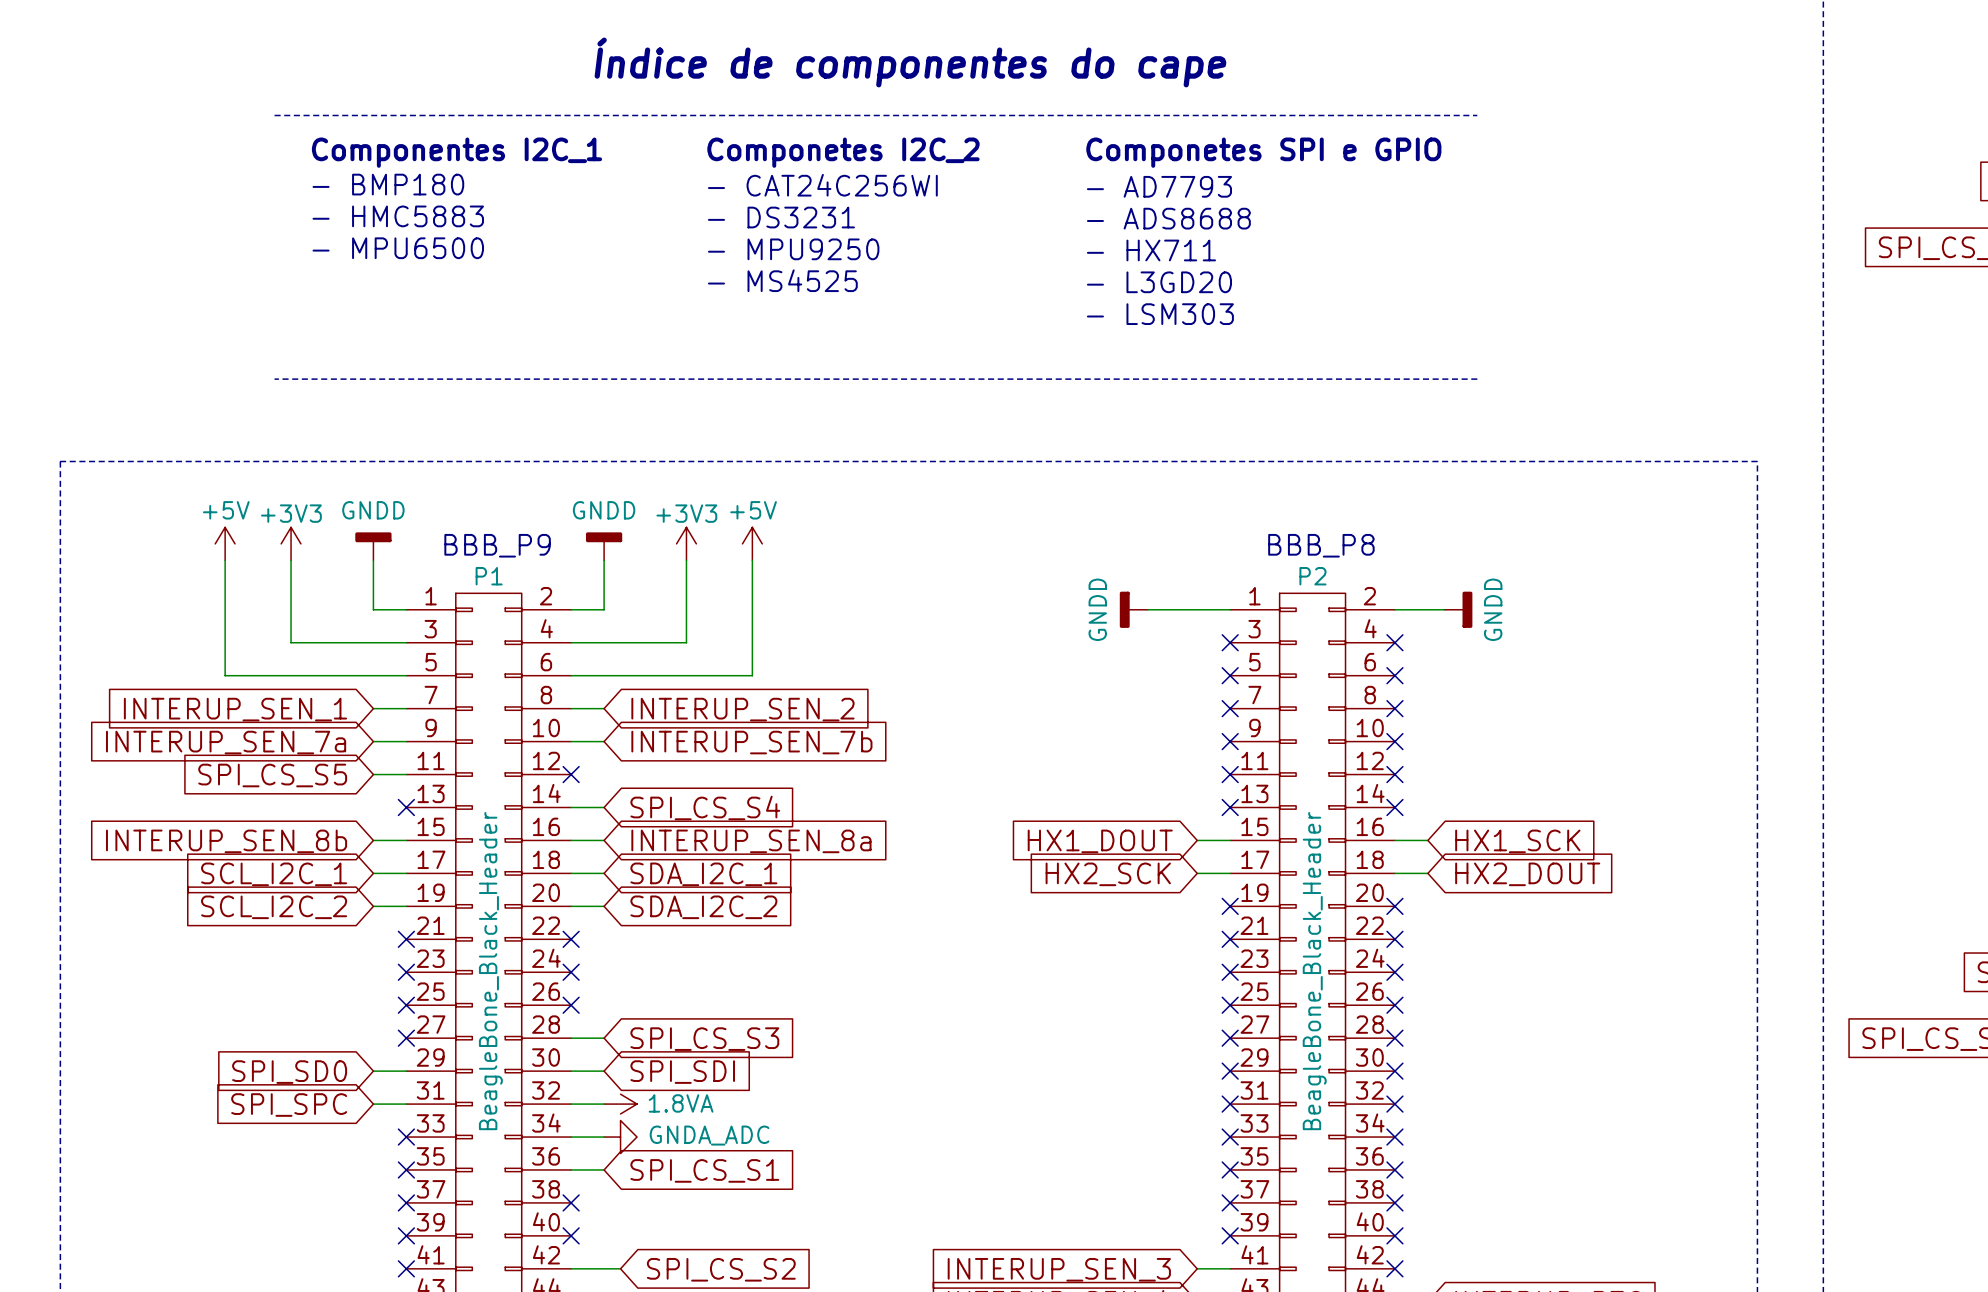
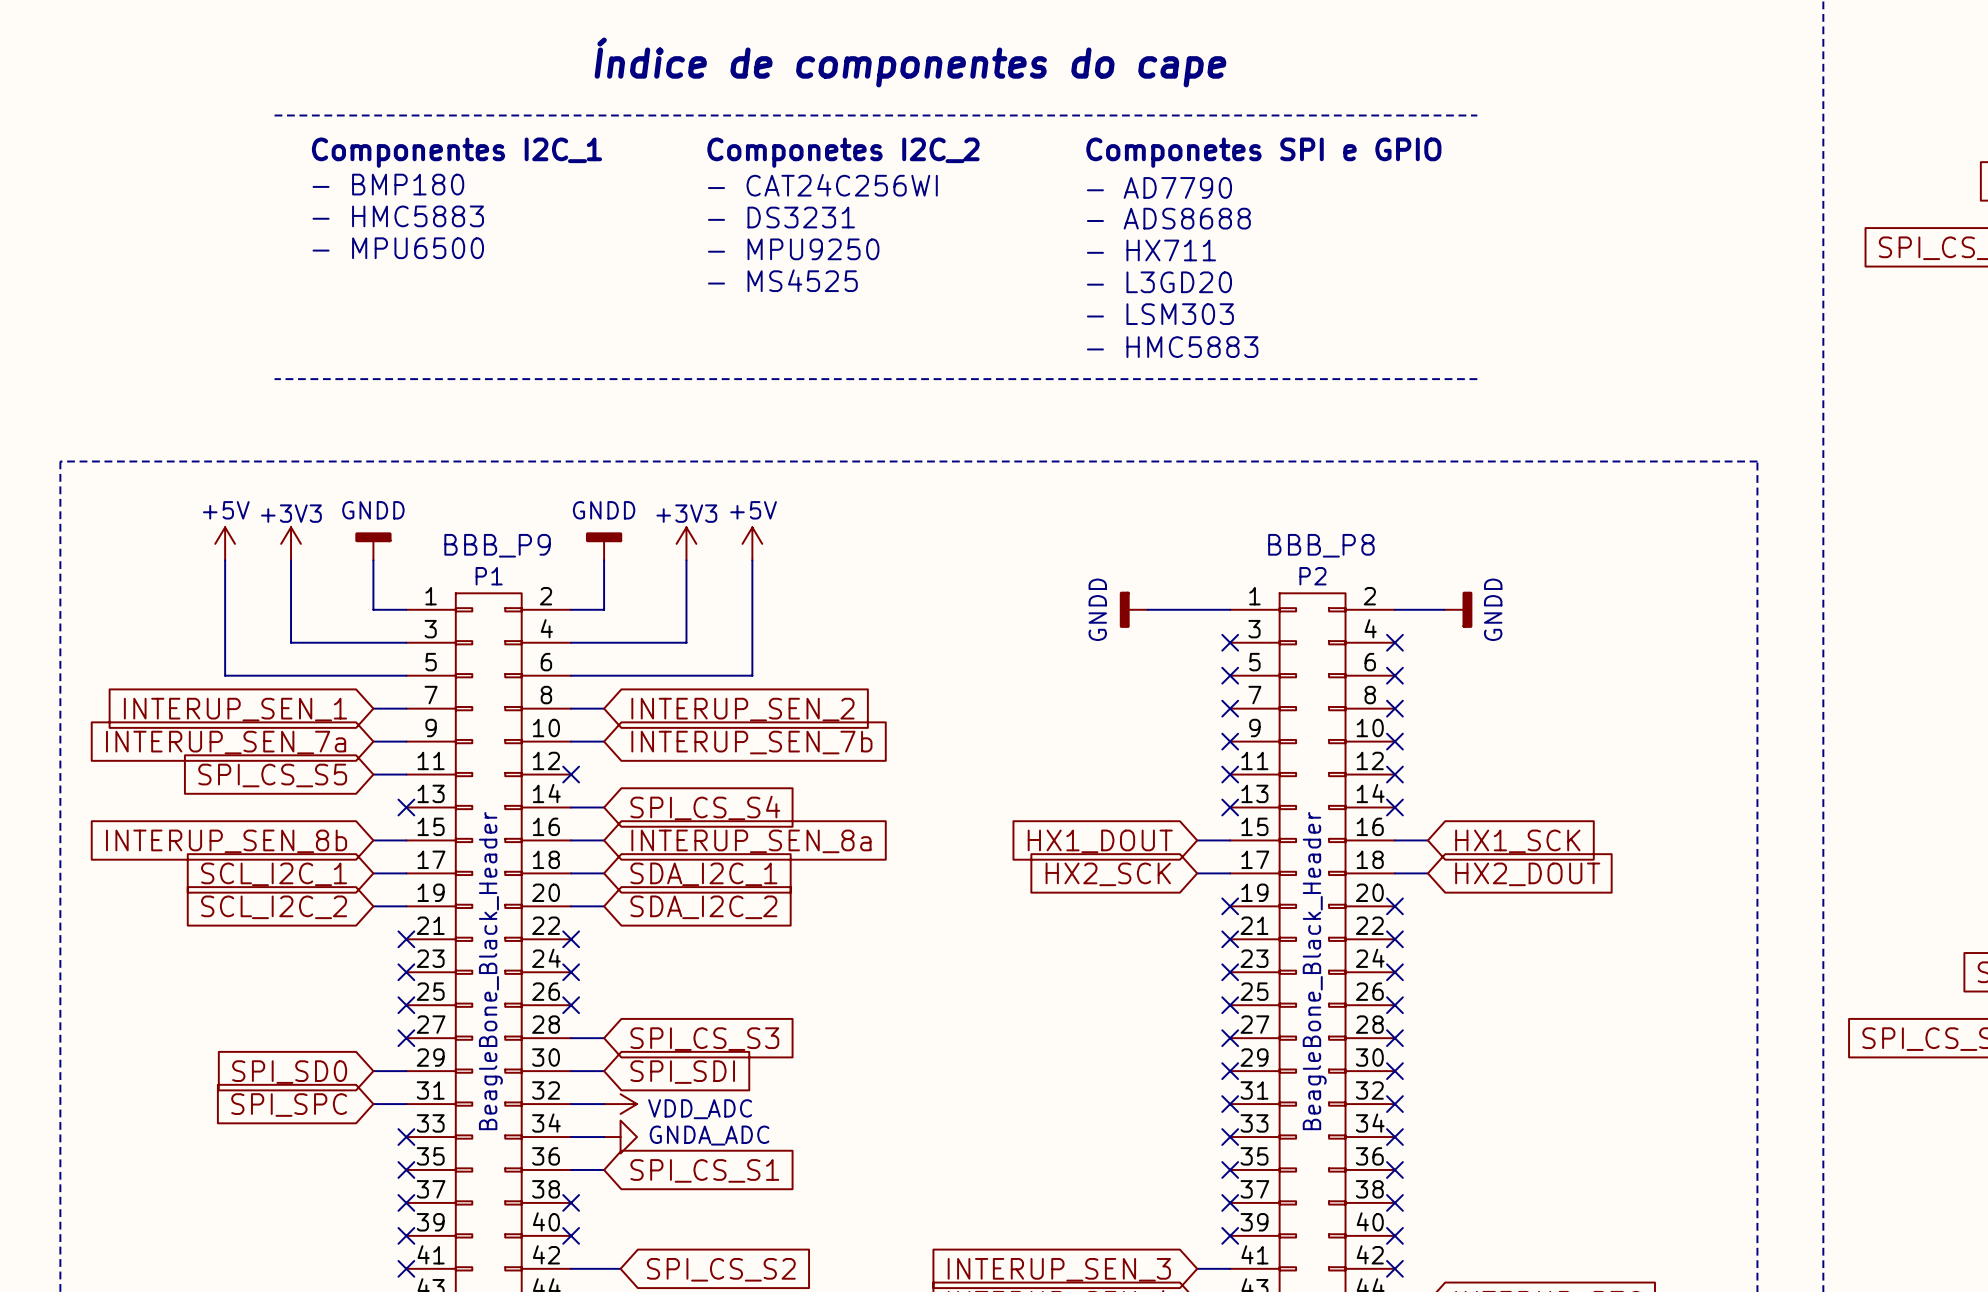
text: - AD7793 (1159, 186) -> - AD7790 (1159, 187)
text: none -> - HMC5883 (1172, 347)
power symbol: 1.8VA (620, 1104) -> VDD_ADC (620, 1104)

